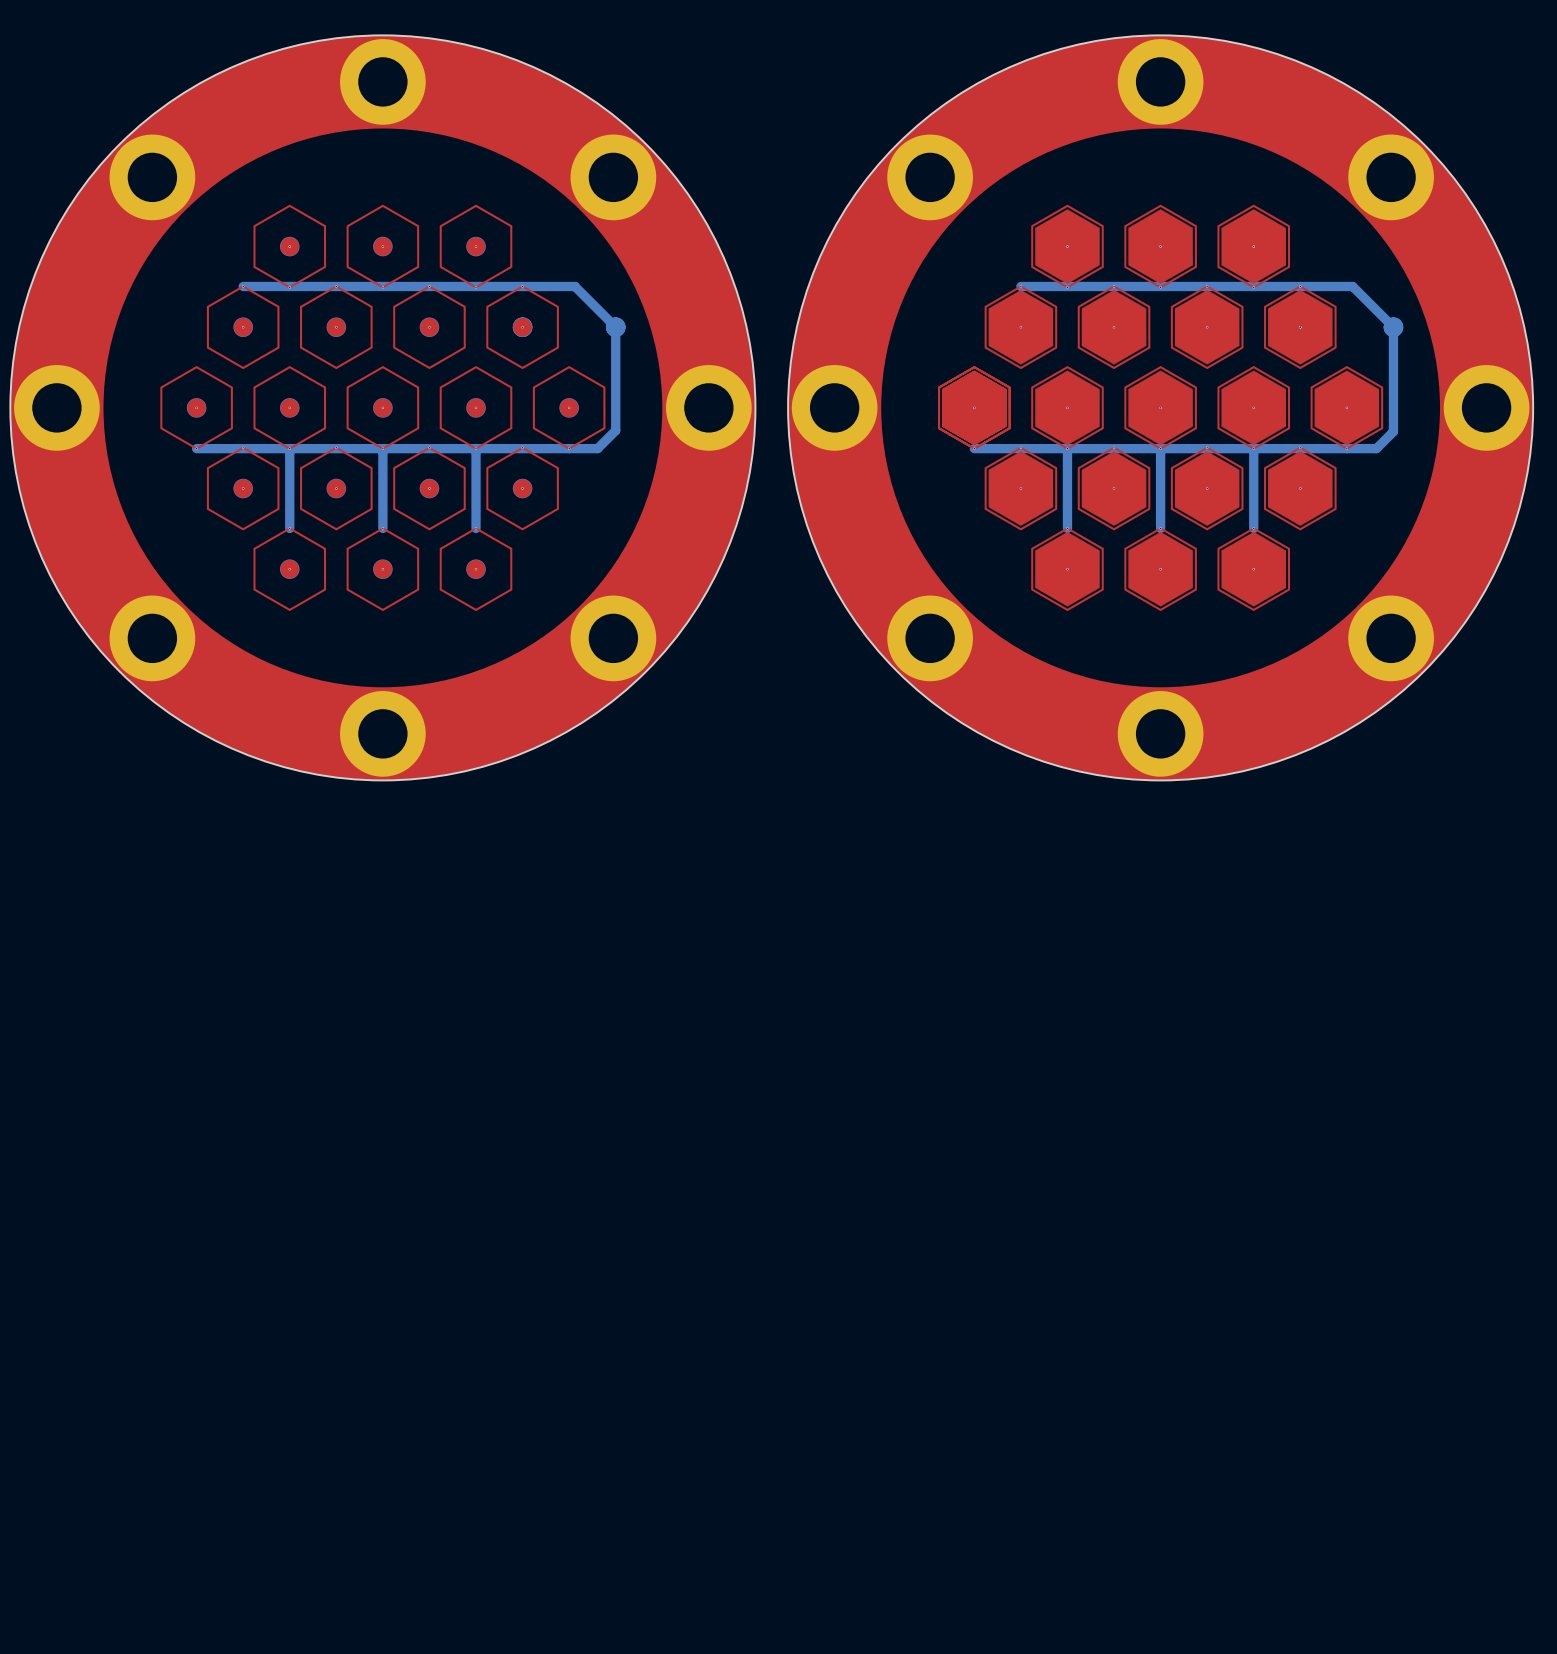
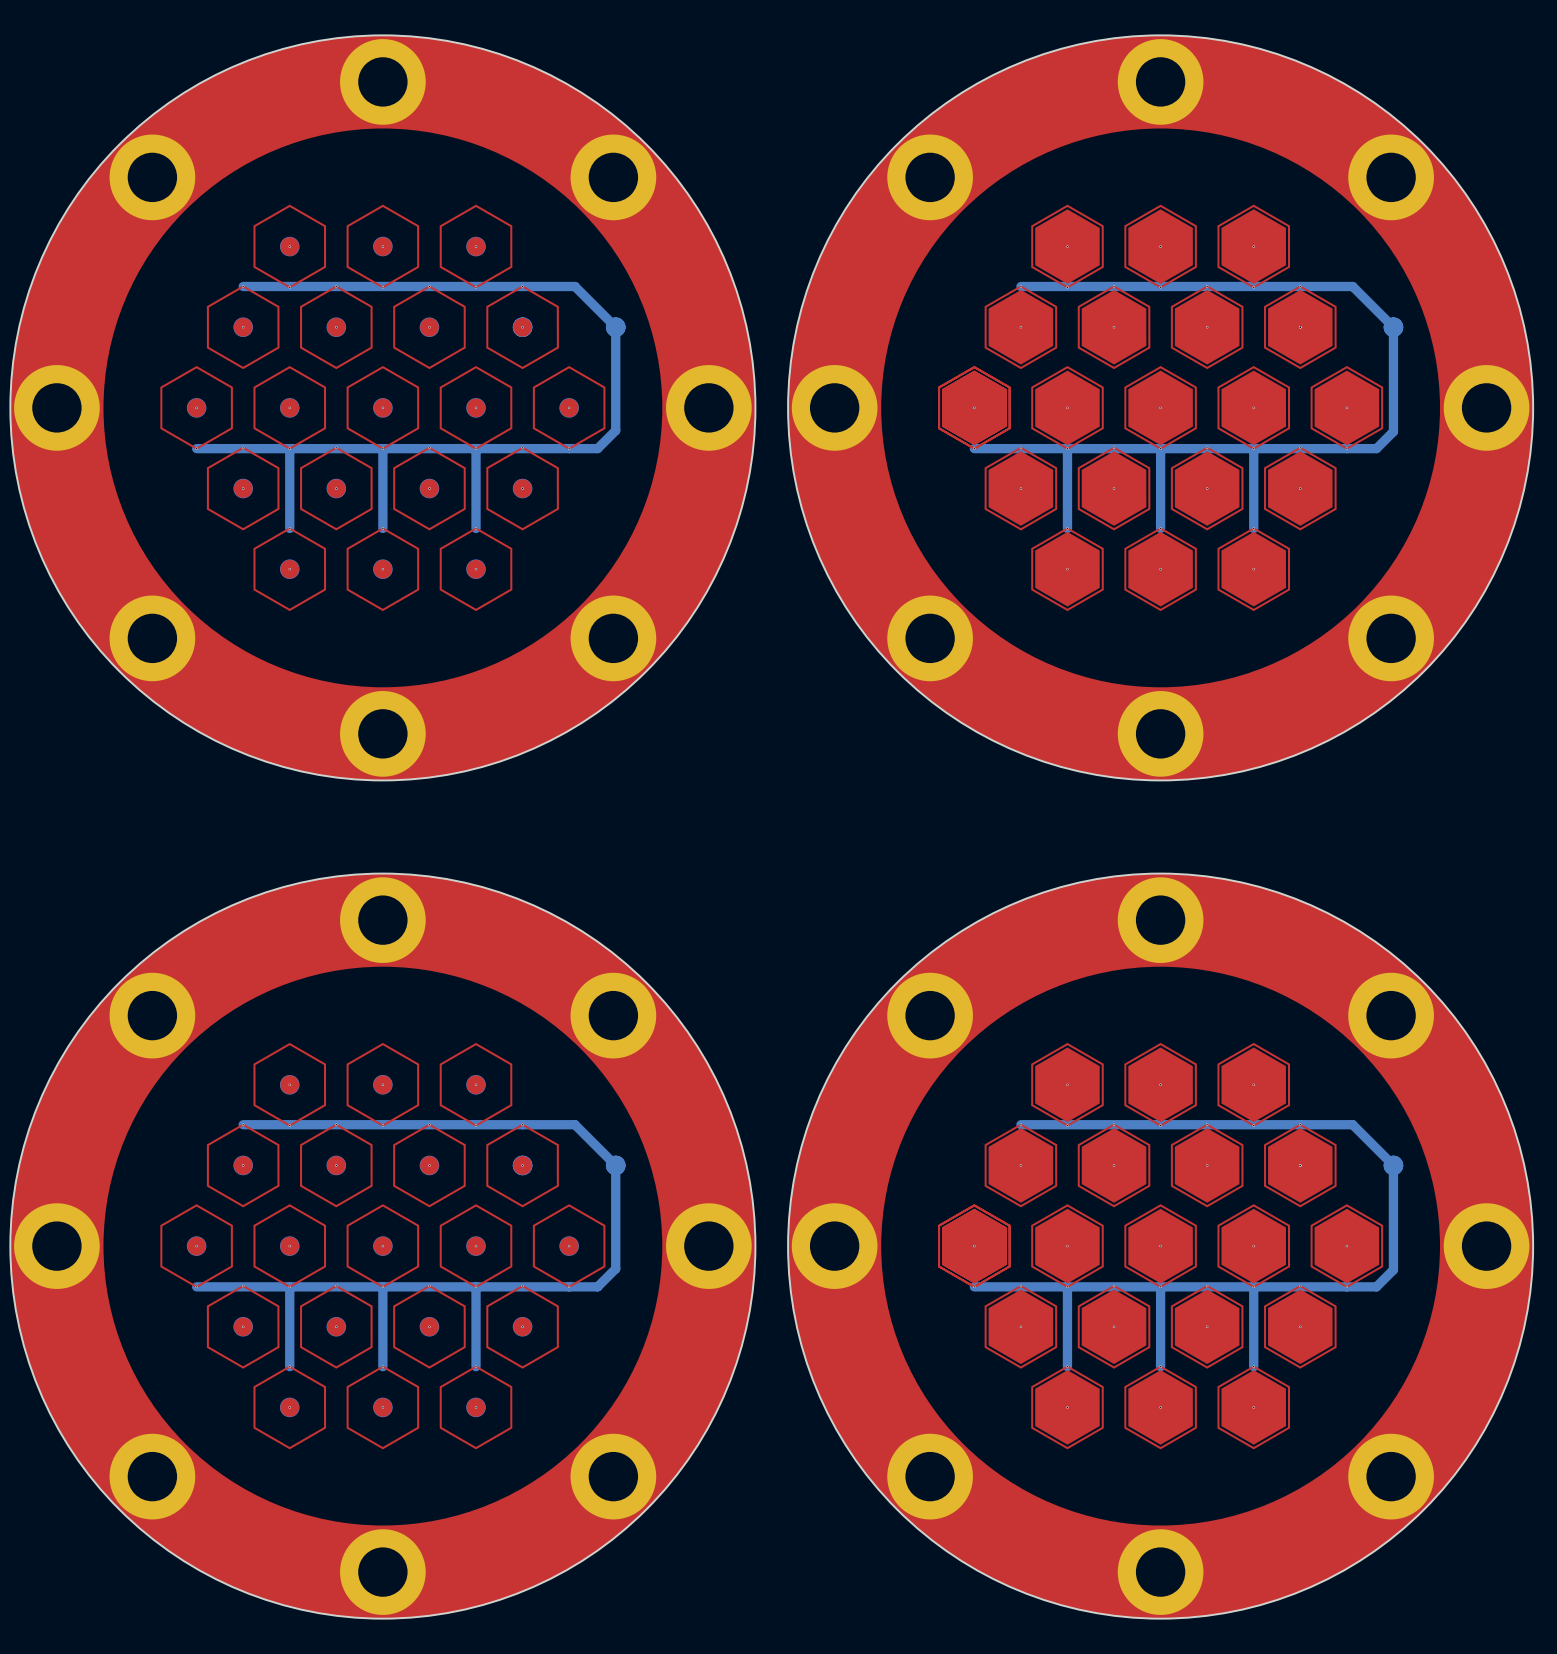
drawing: none -> [10, 873, 756, 1619]
round board edge: none -> [10, 873, 756, 1619]
drawing: none -> [788, 873, 1534, 1619]
round board edge: none -> [788, 873, 1534, 1619]
part: none -> (382, 920)
part: none -> (1160, 920)
part: none -> (152, 1015)
part: none -> (613, 1015)
part: none -> (930, 1015)
part: none -> (1391, 1015)
via: none -> (289, 1084)
via: none -> (382, 1084)
via: none -> (476, 1084)
via: none -> (1067, 1084)
via: none -> (1160, 1084)
via: none -> (1253, 1084)
bottom track: none -> (243, 1124) (574, 1124) (615, 1165) (615, 1268) (597, 1286) (196, 1286)
via: none -> (243, 1124)
via: none -> (336, 1124)
via: none -> (429, 1124)
via: none -> (522, 1124)
bottom track: none -> (1020, 1124) (1352, 1124) (1393, 1165) (1393, 1269) (1376, 1286) (974, 1286)
via: none -> (1020, 1124)
via: none -> (1114, 1124)
via: none -> (1207, 1124)
via: none -> (1300, 1124)
via: none -> (289, 1125)
via: none -> (382, 1125)
via: none -> (476, 1125)
via: none -> (1067, 1125)
via: none -> (1160, 1125)
via: none -> (1253, 1125)
via: none -> (243, 1165)
via: none -> (336, 1165)
via: none -> (429, 1165)
via: none -> (522, 1165)
via: none -> (1020, 1165)
via: none -> (1114, 1165)
via: none -> (1207, 1165)
via: none -> (1300, 1165)
part: none -> (56, 1246)
via: none -> (196, 1246)
via: none -> (289, 1246)
via: none -> (382, 1246)
via: none -> (476, 1246)
via: none -> (569, 1246)
part: none -> (708, 1246)
part: none -> (834, 1246)
via: none -> (974, 1246)
via: none -> (1067, 1246)
via: none -> (1160, 1246)
via: none -> (1253, 1246)
via: none -> (1346, 1246)
part: none -> (1486, 1246)
via: none -> (196, 1286)
via: none -> (243, 1286)
bottom track: none -> (289, 1286) (289, 1366)
via: none -> (289, 1286)
via: none -> (336, 1286)
bottom track: none -> (382, 1286) (382, 1366)
via: none -> (382, 1286)
via: none -> (429, 1286)
bottom track: none -> (476, 1286) (476, 1366)
via: none -> (476, 1286)
via: none -> (522, 1286)
via: none -> (569, 1286)
via: none -> (974, 1286)
via: none -> (1020, 1286)
bottom track: none -> (1067, 1286) (1067, 1366)
via: none -> (1067, 1286)
via: none -> (1114, 1286)
bottom track: none -> (1160, 1286) (1160, 1366)
via: none -> (1160, 1286)
via: none -> (1207, 1286)
bottom track: none -> (1253, 1286) (1253, 1366)
via: none -> (1253, 1286)
via: none -> (1300, 1286)
via: none -> (1346, 1286)
via: none -> (243, 1326)
via: none -> (336, 1326)
via: none -> (429, 1326)
via: none -> (522, 1326)
via: none -> (1020, 1326)
via: none -> (1114, 1326)
via: none -> (1207, 1326)
via: none -> (1300, 1326)
via: none -> (289, 1366)
via: none -> (382, 1366)
via: none -> (476, 1366)
via: none -> (1067, 1366)
via: none -> (1160, 1366)
via: none -> (1253, 1366)
via: none -> (289, 1407)
via: none -> (382, 1407)
via: none -> (476, 1407)
via: none -> (1067, 1407)
via: none -> (1160, 1407)
via: none -> (1253, 1407)
part: none -> (152, 1476)
part: none -> (613, 1476)
part: none -> (930, 1476)
part: none -> (1391, 1476)
part: none -> (382, 1572)
part: none -> (1160, 1572)

